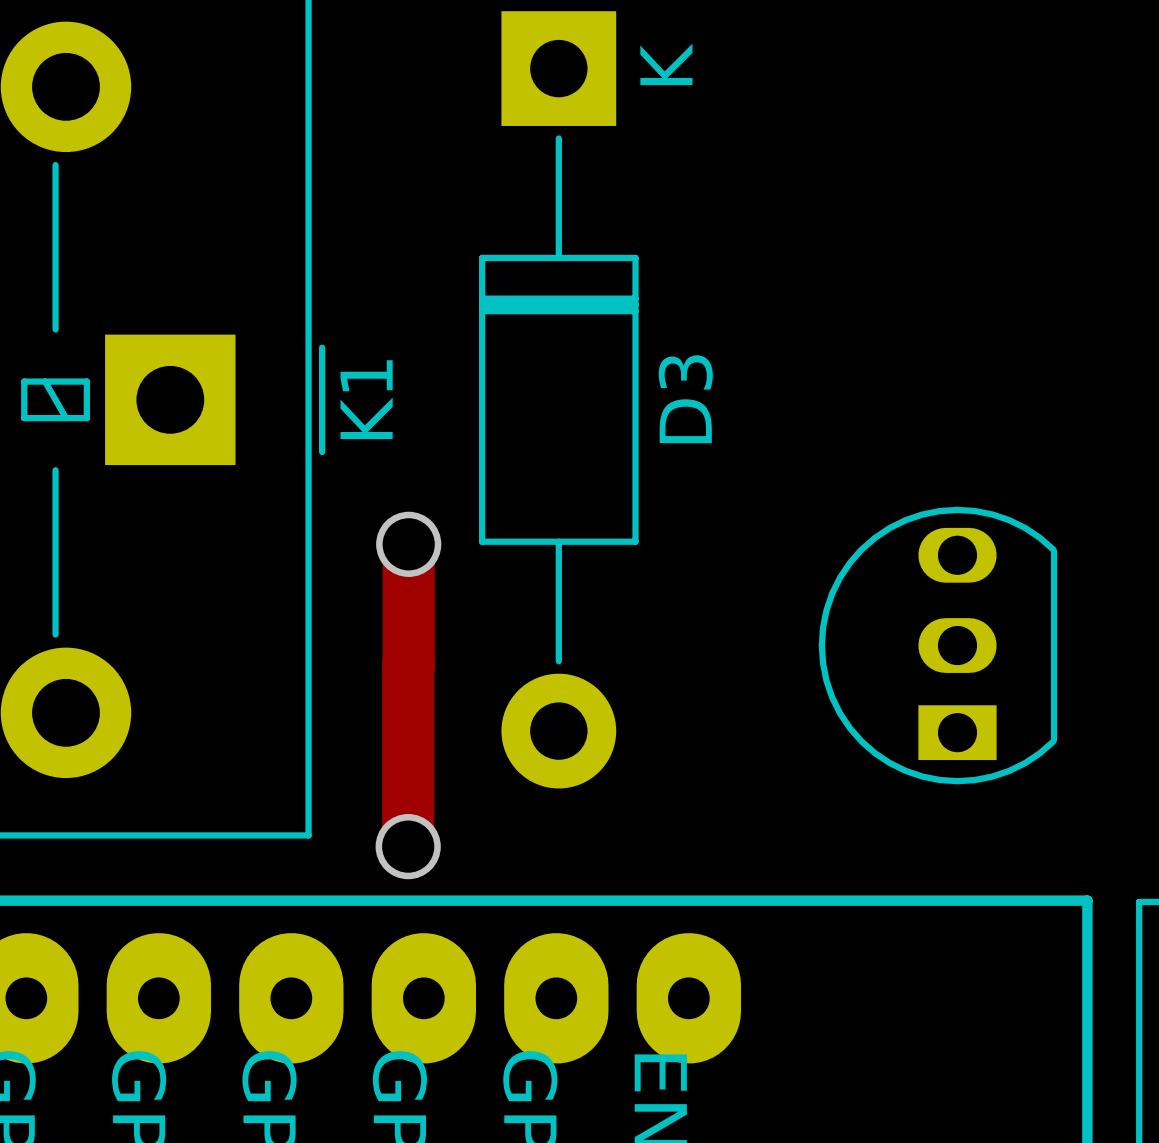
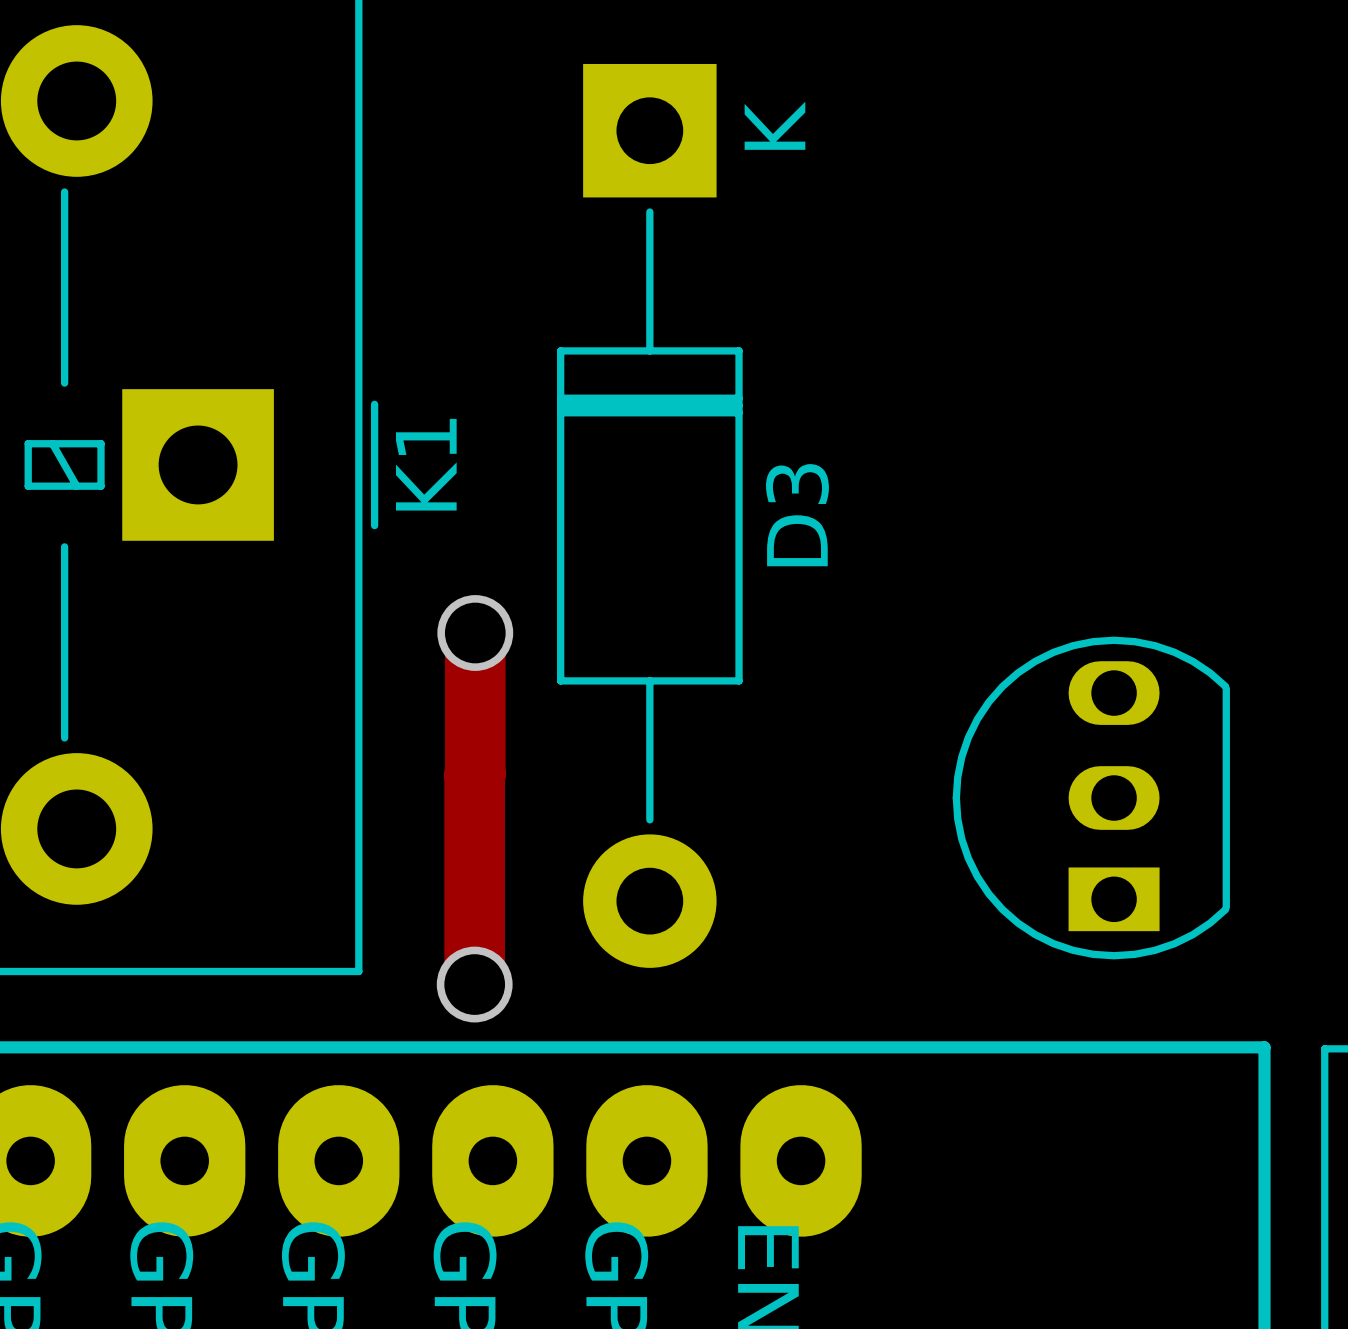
D3 position: (558, 399) -> (649, 515)
part position: (937, 645) -> (1091, 798)

